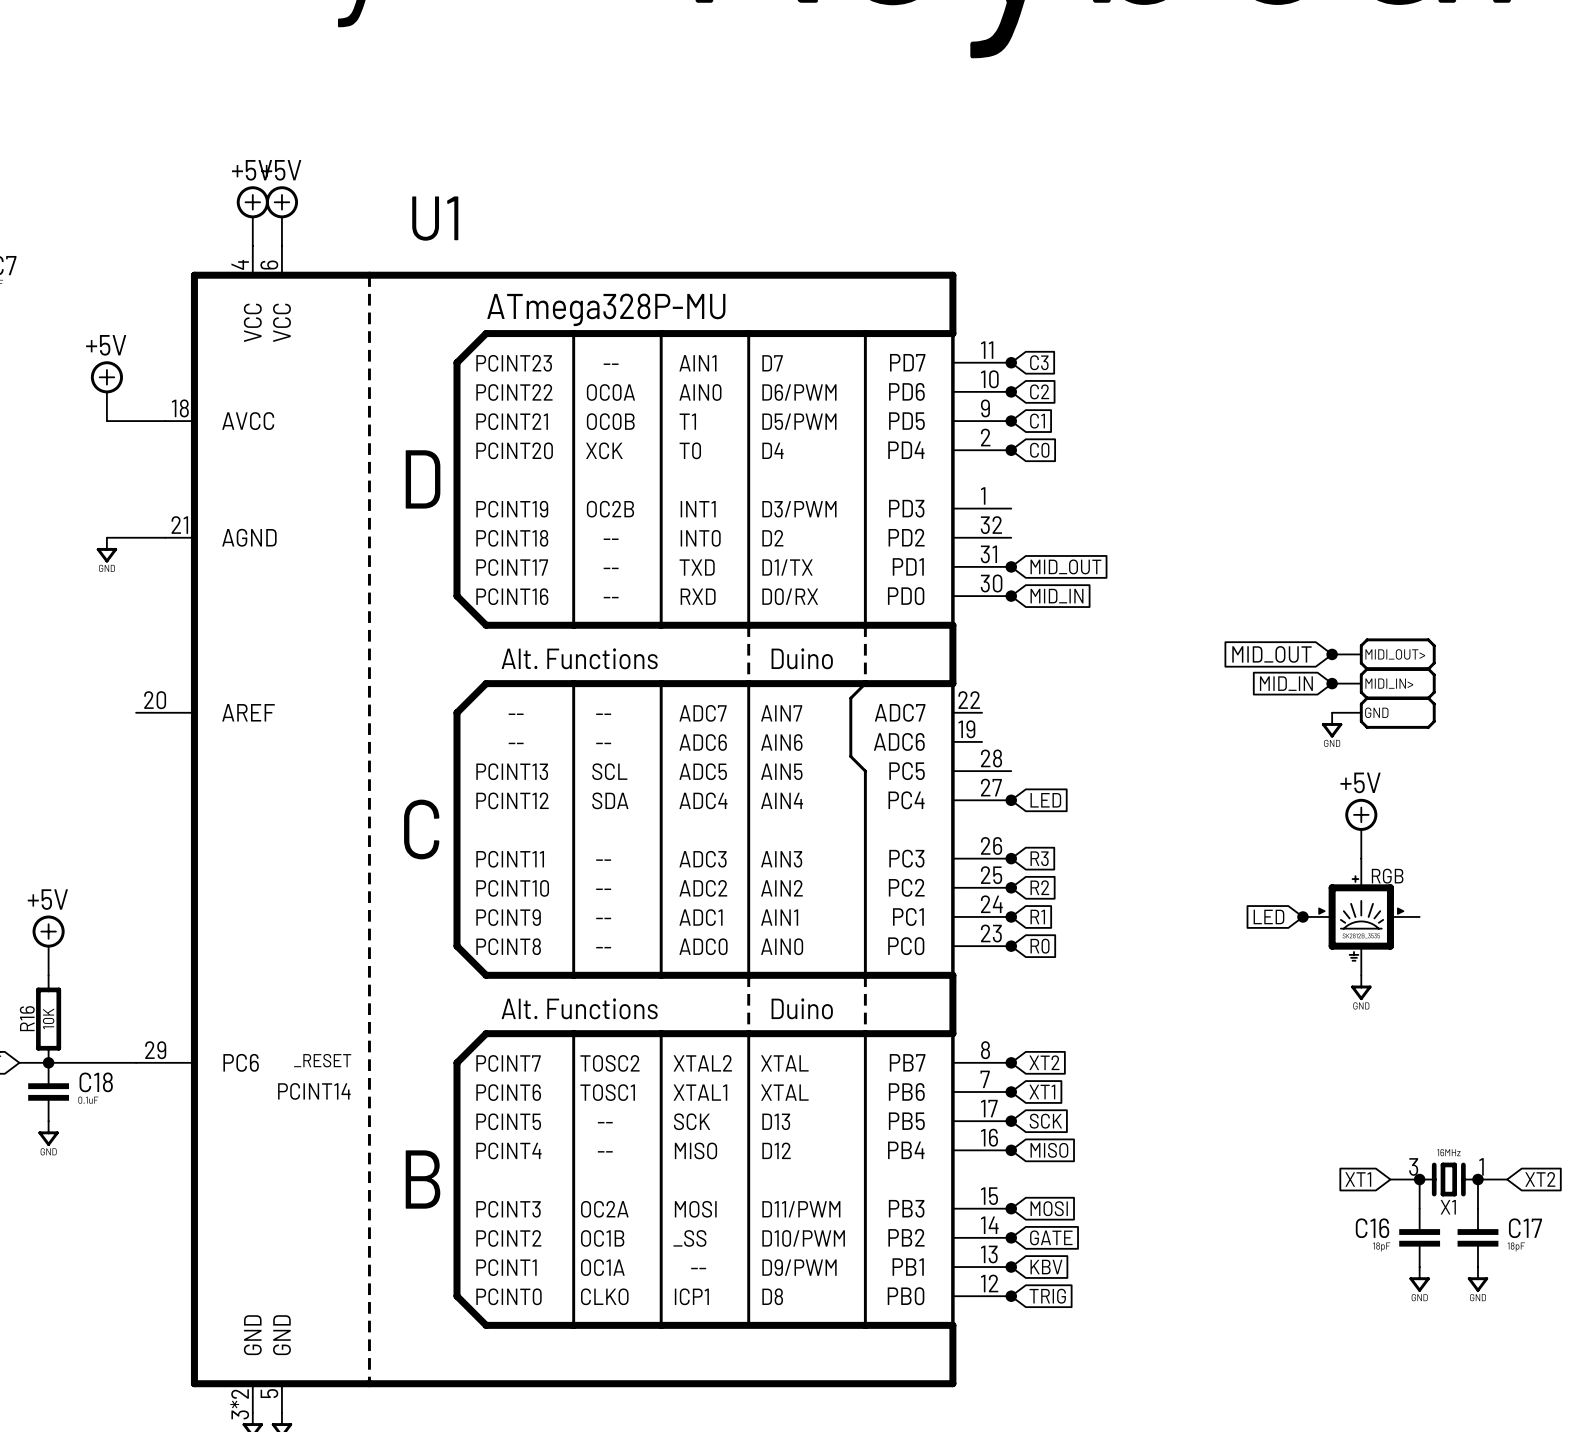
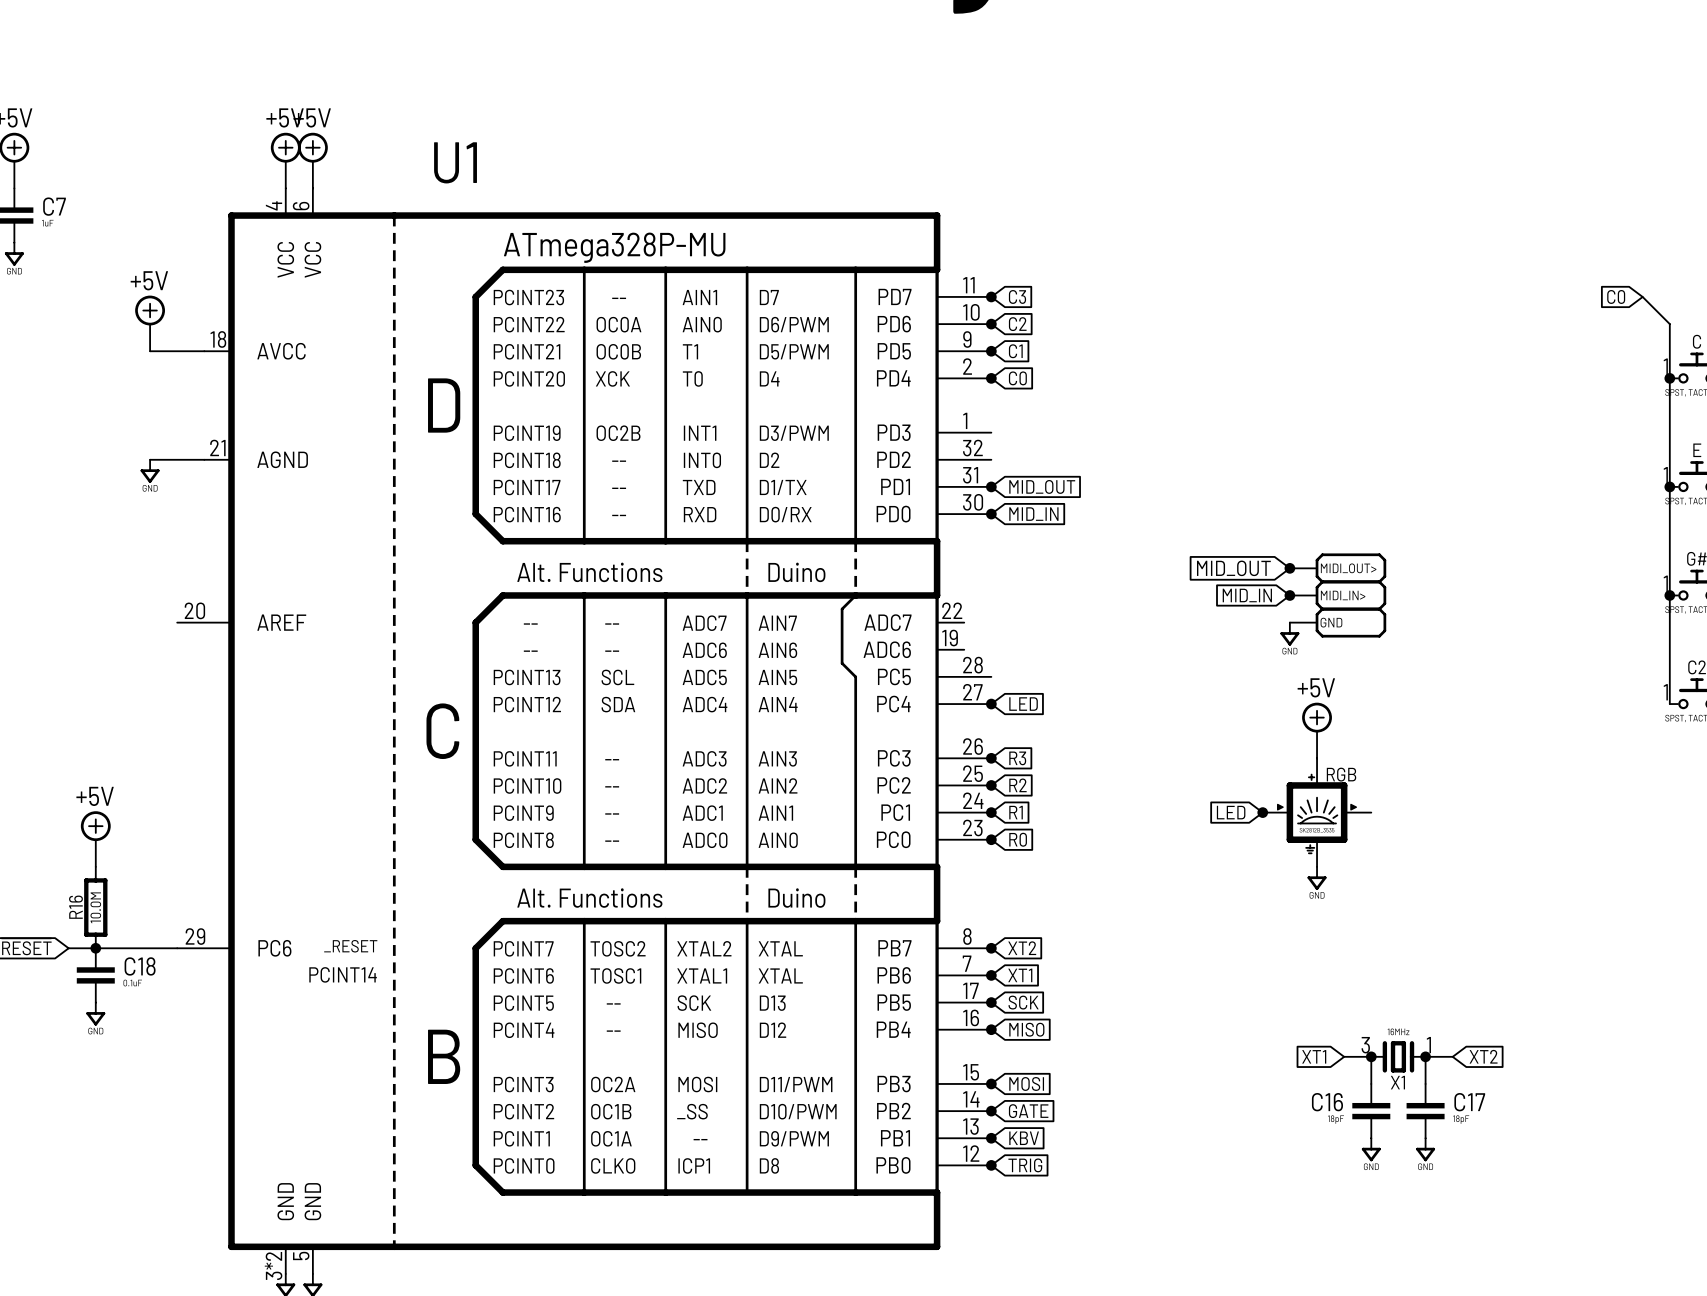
R16 value: 10K (48, 1018) -> 10.0M (95, 907)

